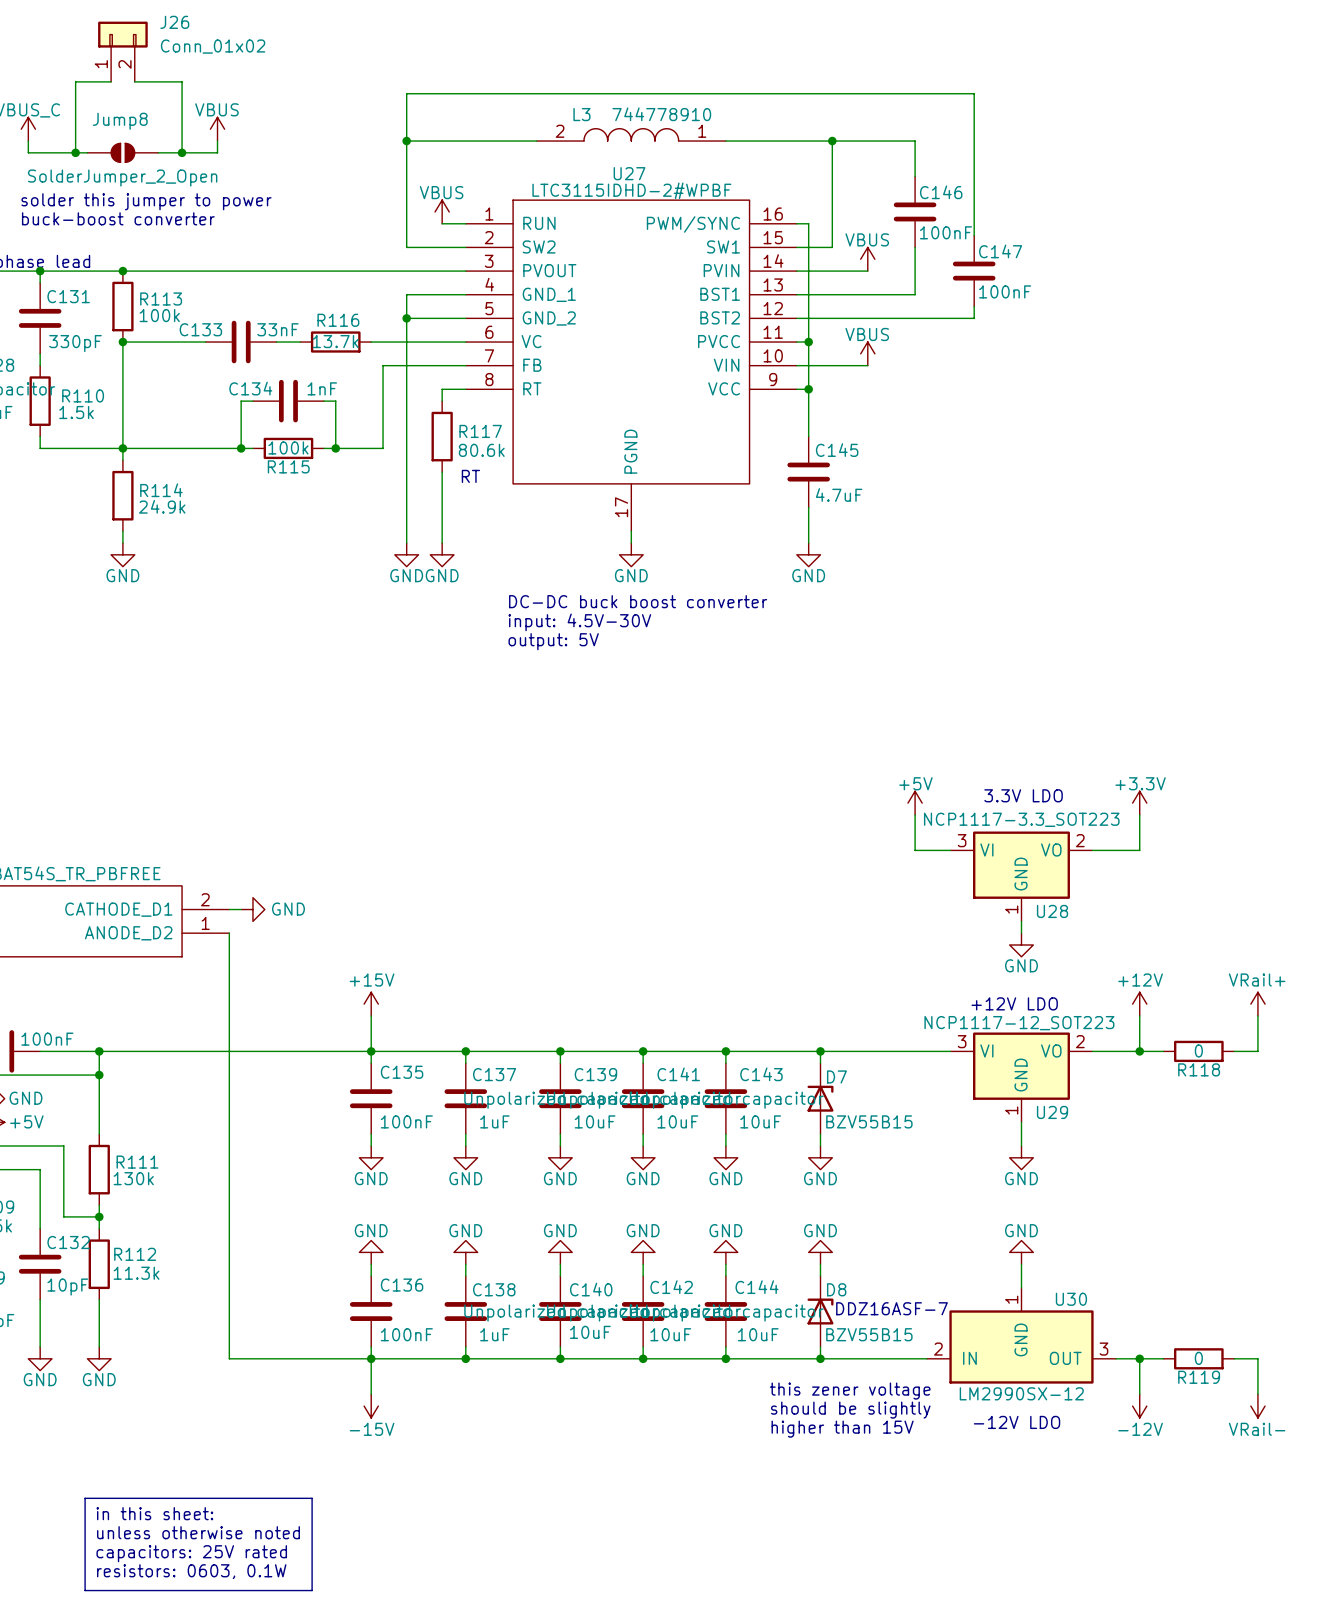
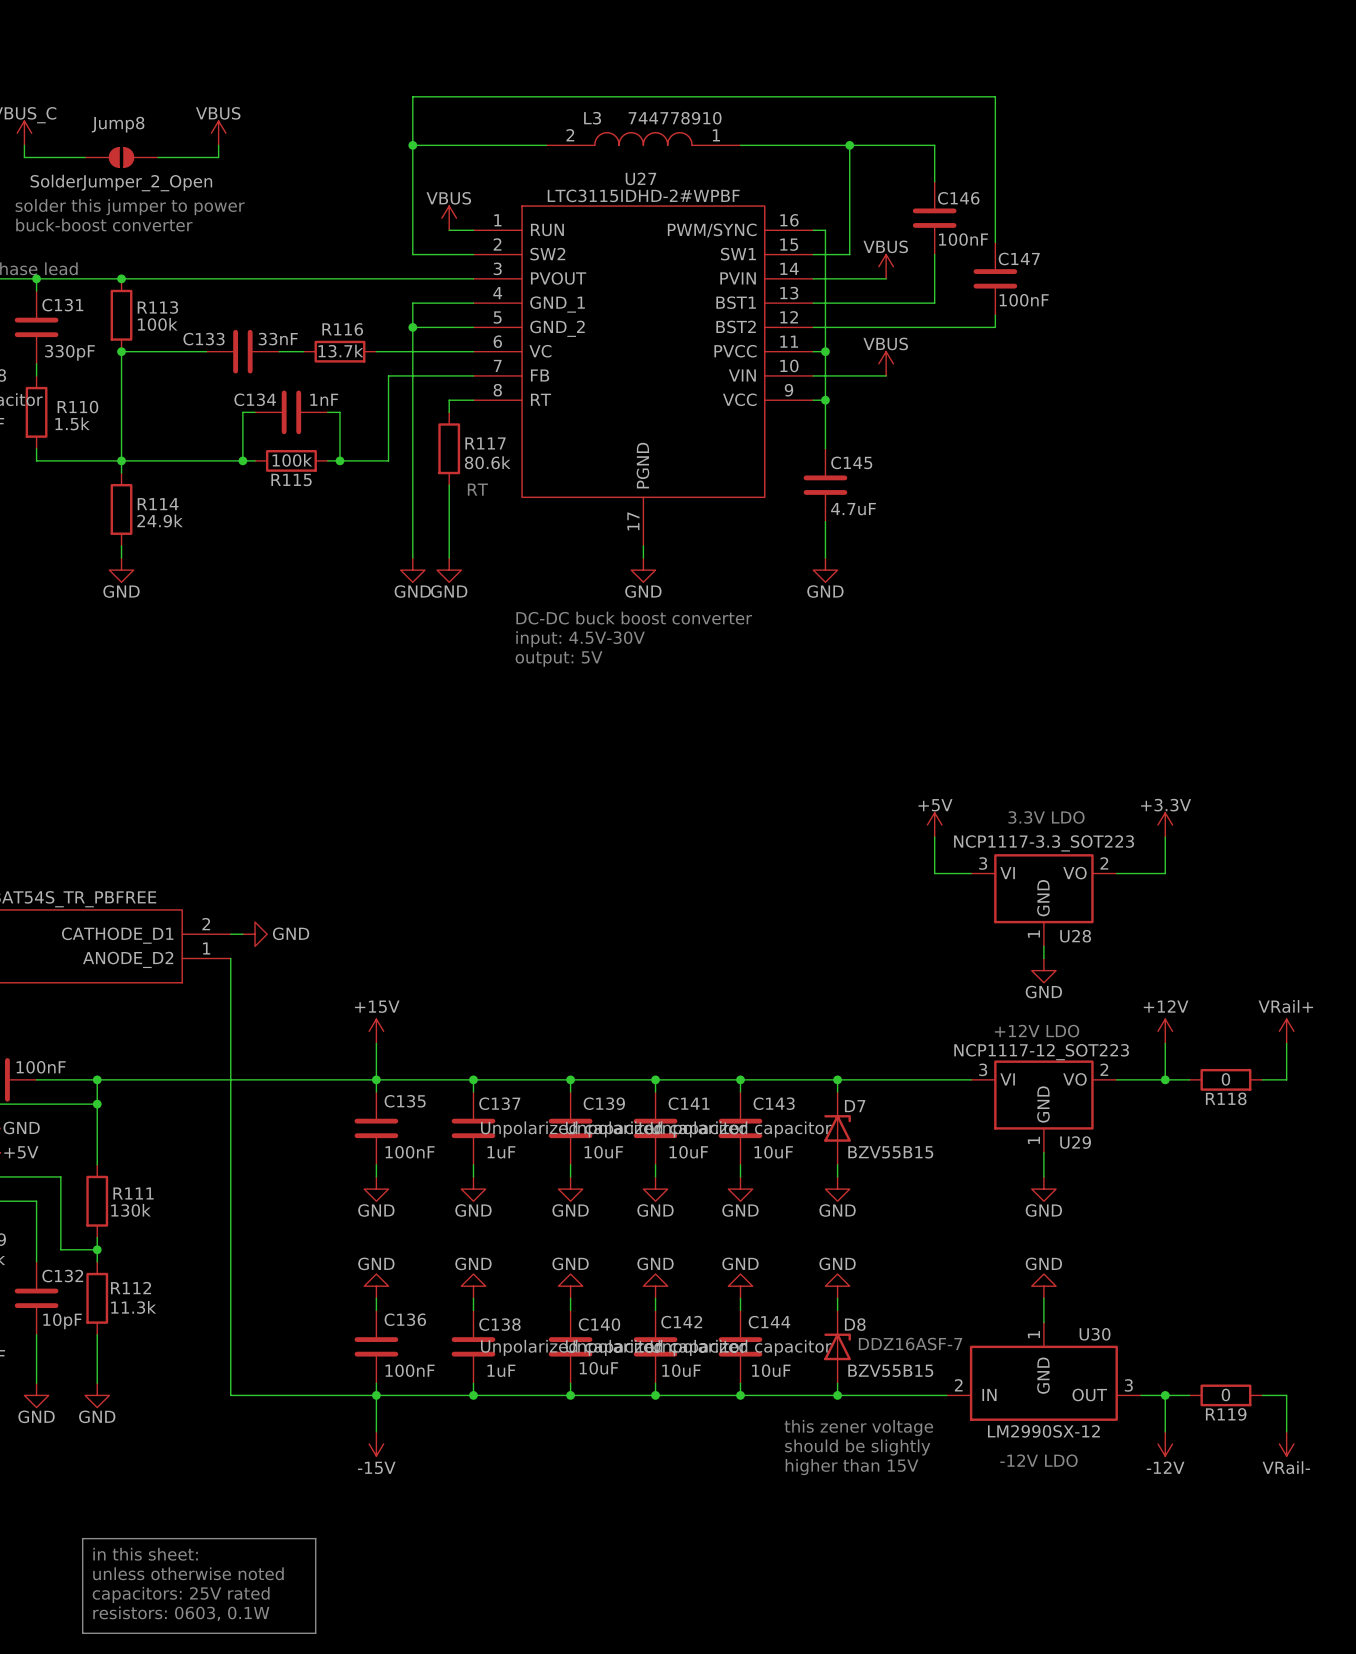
J26: Conn_01x02 (122, 51) -> none
wire: (111, 81) (75, 81) (75, 152) -> none
wire: (134, 81) (182, 81) (182, 152) -> none
junction: (75, 152) -> none
junction: (182, 152) -> none

